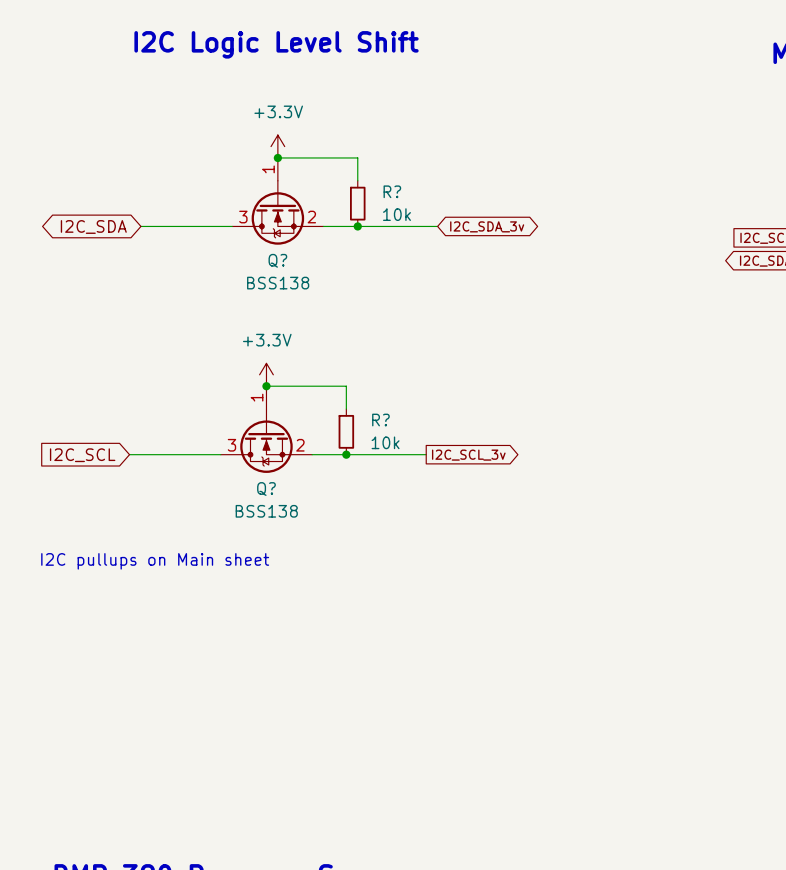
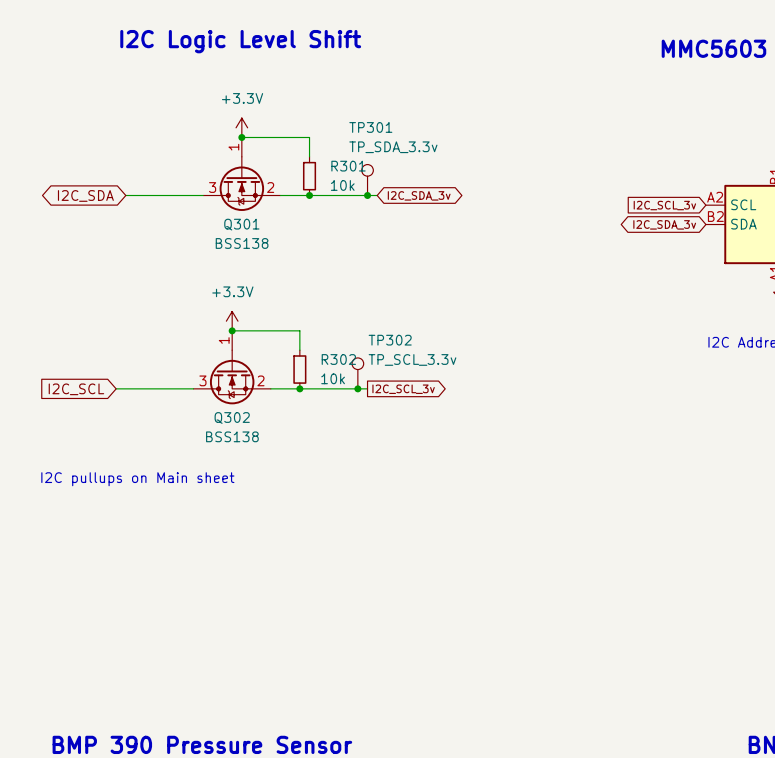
R? name: R? (392, 191) -> R301 (348, 166)
TP301: none -> TP_SDA_3.3v (367, 180)
junction: none -> (367, 195)
Q? name: Q? (277, 260) -> Q301 (241, 224)
R? name: R? (380, 420) -> R302 (338, 359)
TP302: none -> TP_SCL_3.3v (357, 373)
junction: none -> (357, 388)
Q? name: Q? (266, 489) -> Q302 (232, 417)

